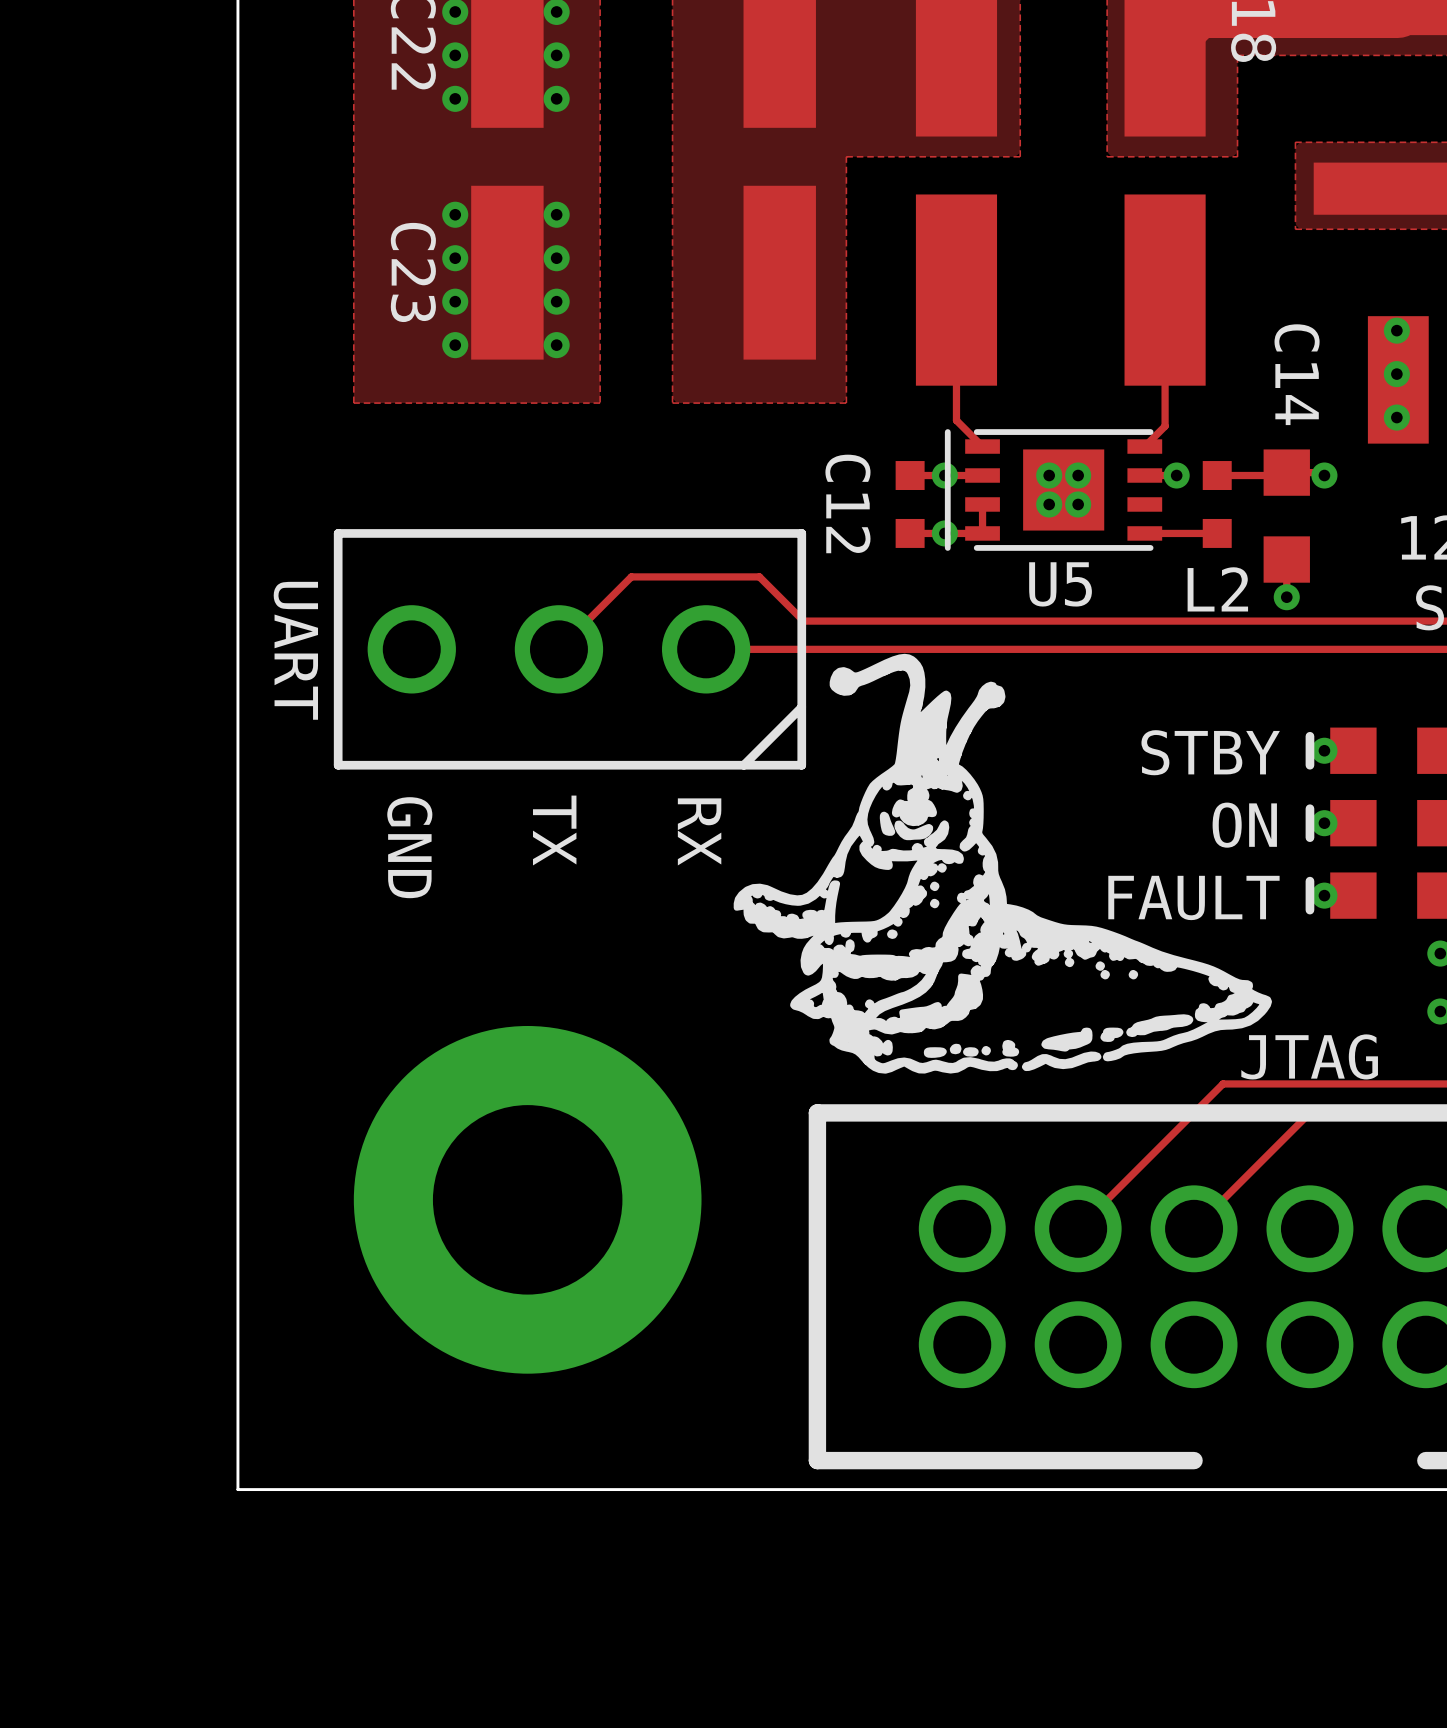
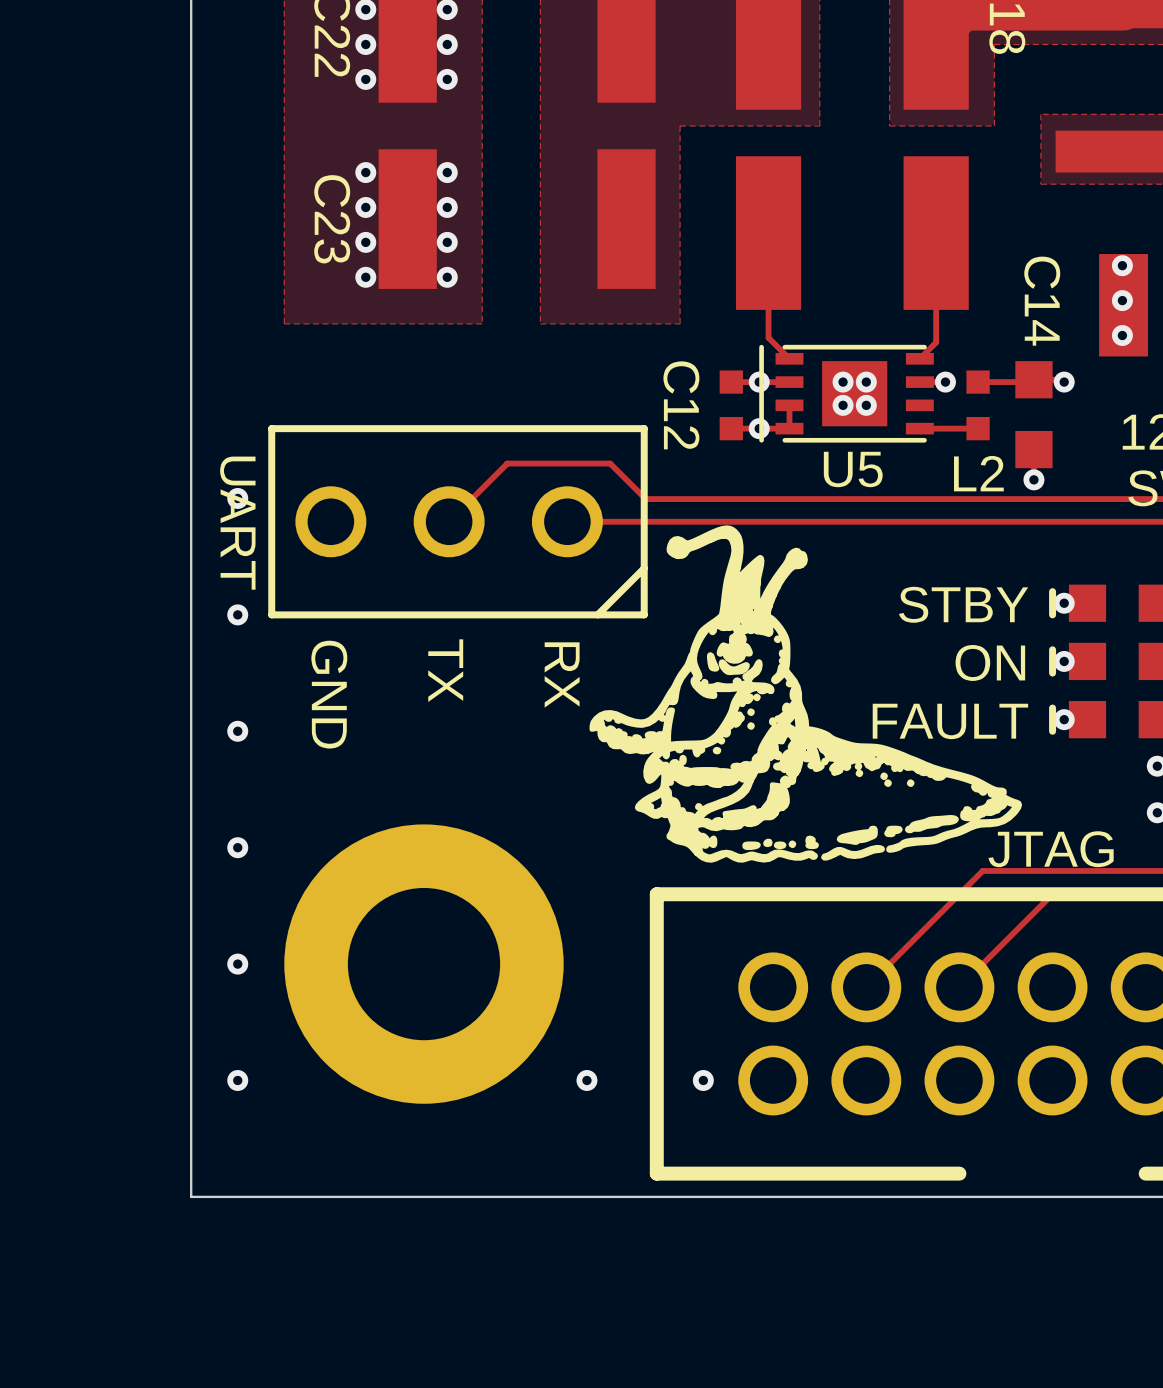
via: none -> (237, 498)
via: none -> (237, 614)
via: none -> (237, 731)
via: none -> (237, 847)
via: none -> (237, 964)
via: none -> (237, 1080)
via: none -> (586, 1080)
via: none -> (703, 1080)

